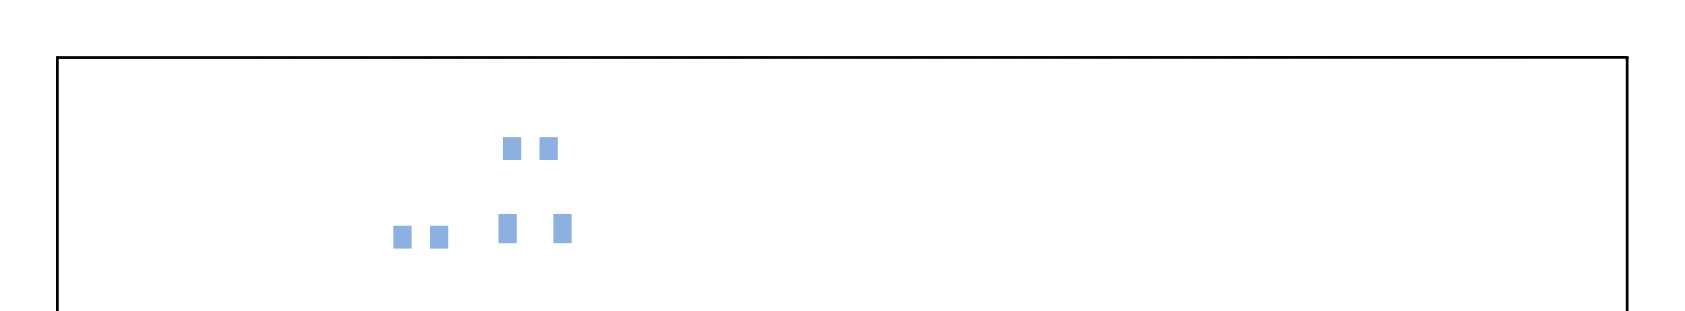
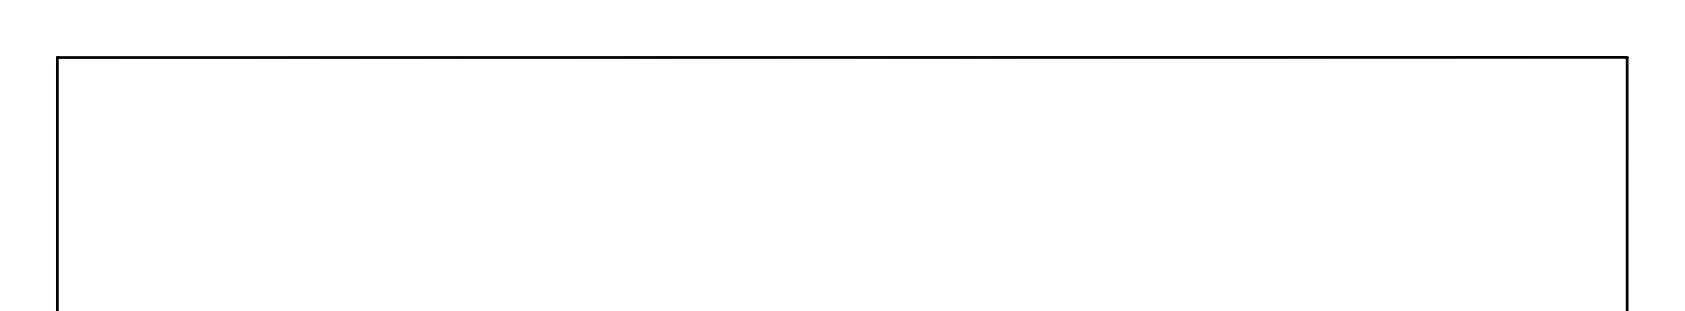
part: (530, 148) -> none
part: (535, 228) -> none
part: (420, 237) -> none

